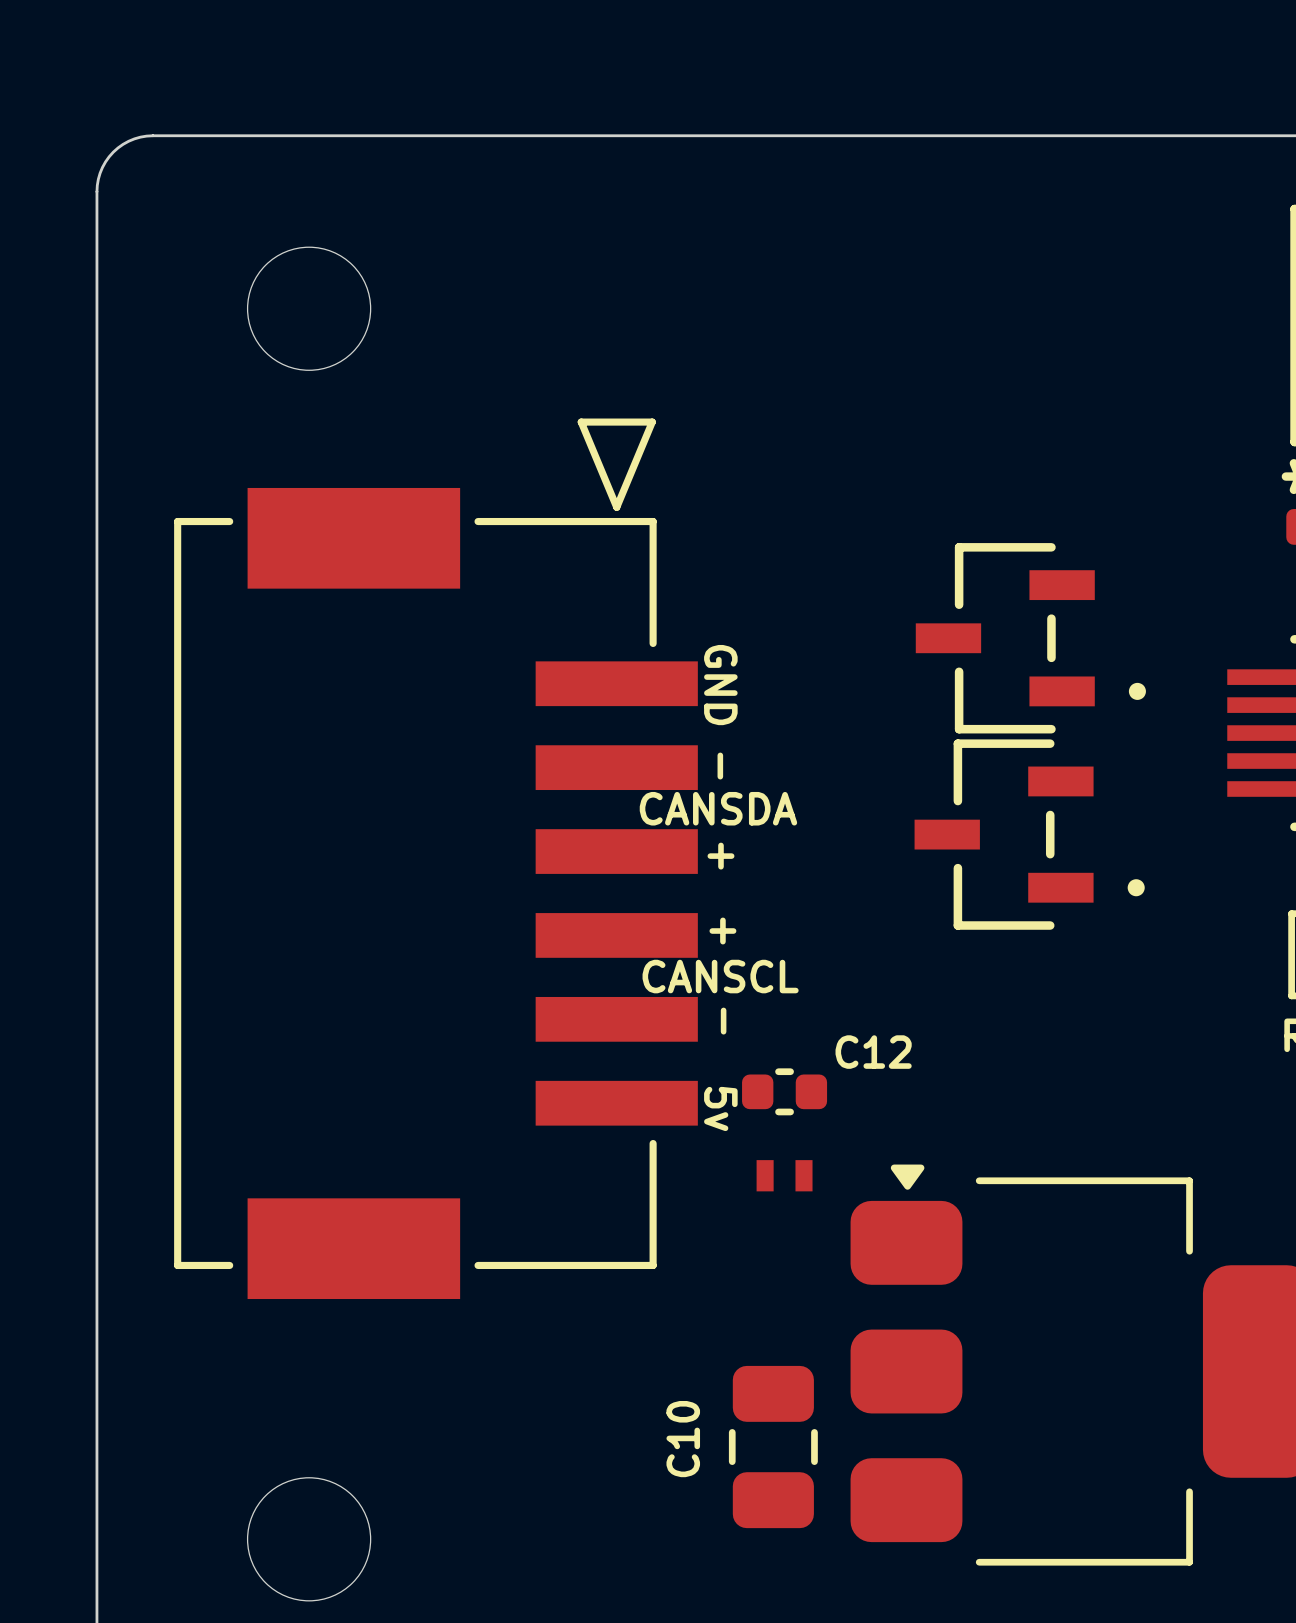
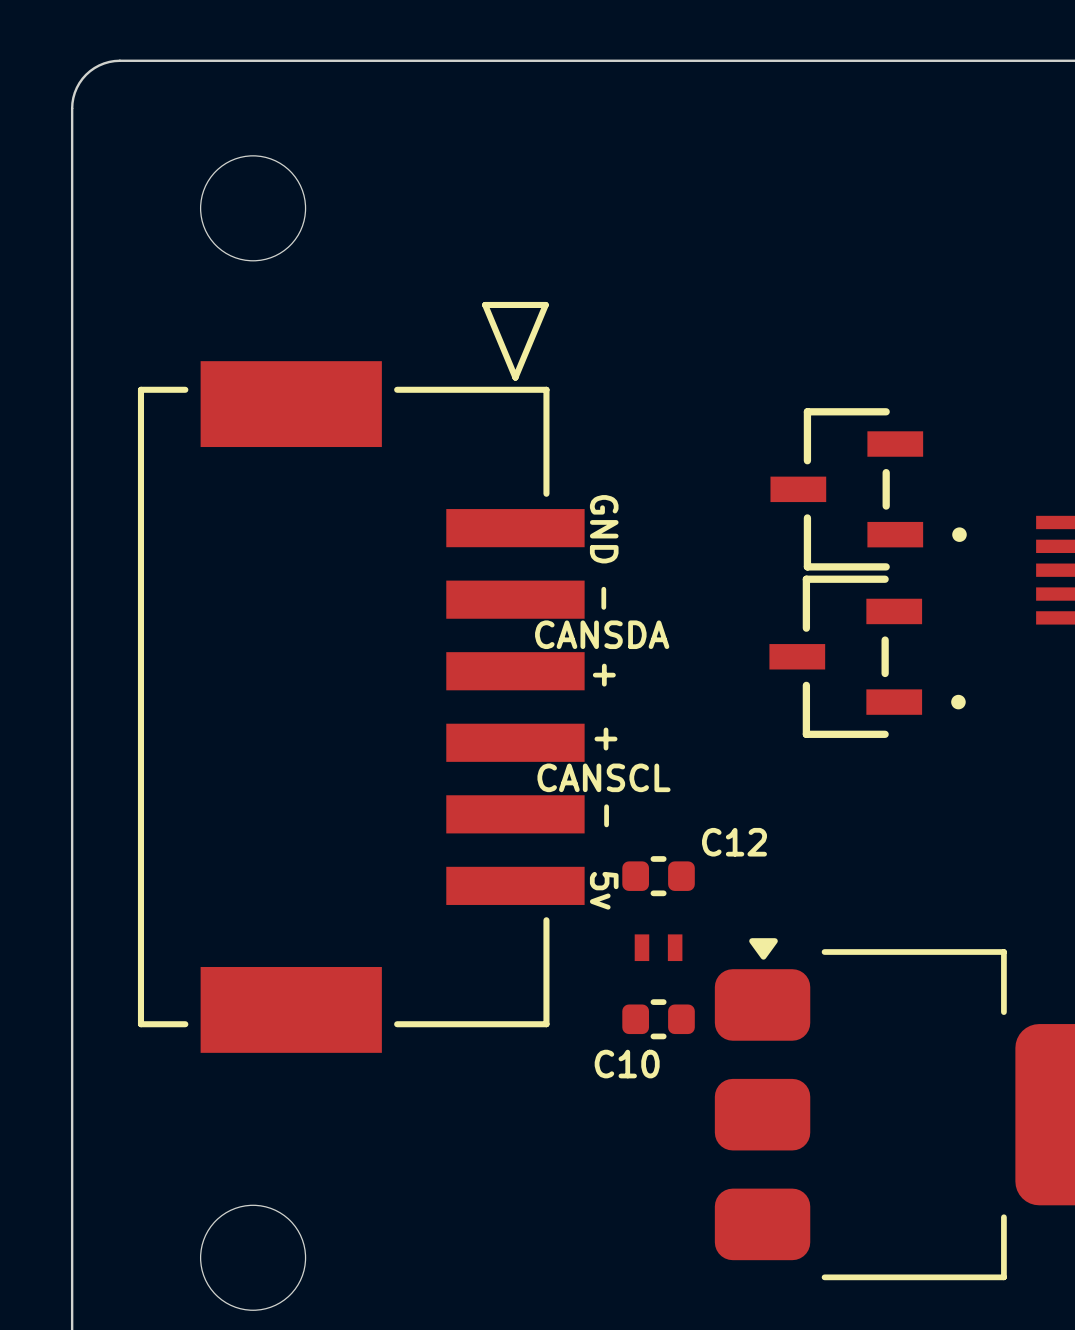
part: none -> (658, 1019)
text rotation: 0° (683, 1439) -> 90° clockwise (627, 1064)
text position: C10 (683, 1439) -> C10 (627, 1064)
part: (773, 1447) -> none

